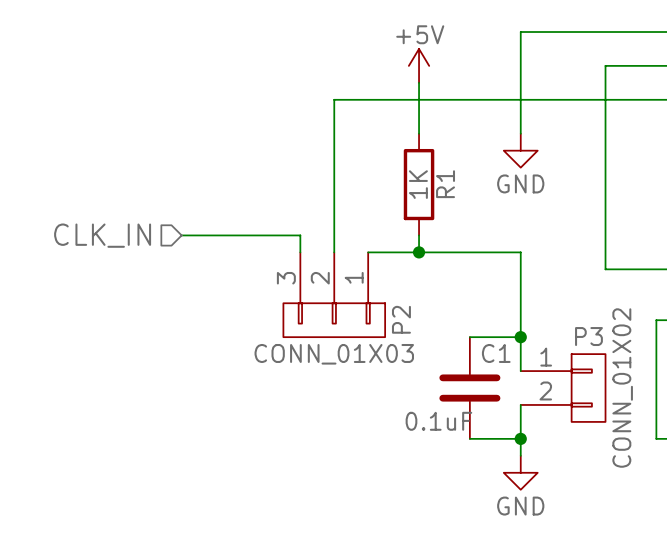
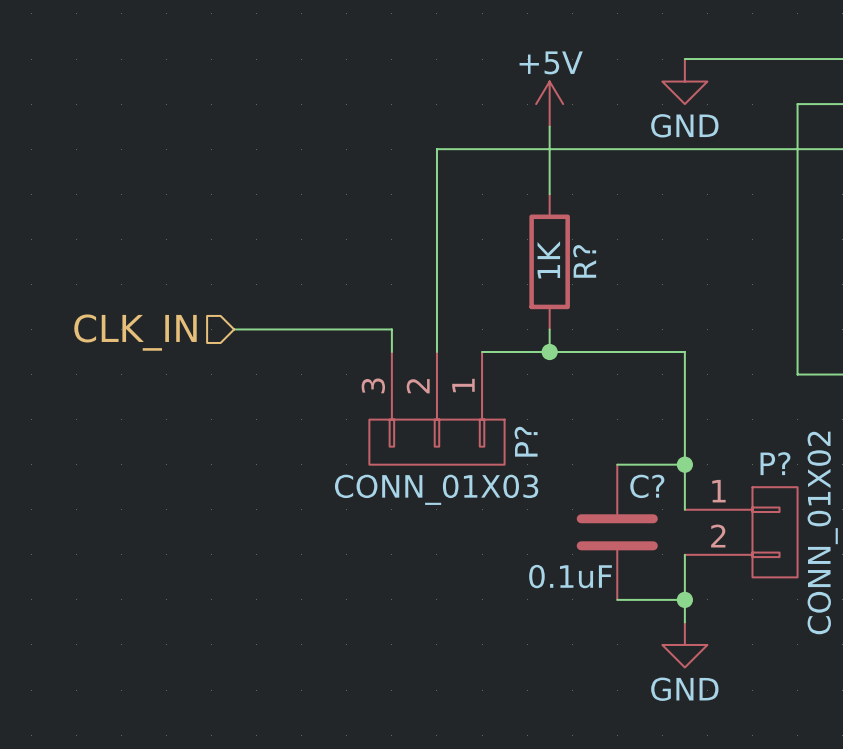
wire: (520, 32) (520, 133) -> none
power symbol position: GND (520, 150) -> GND (684, 81)
R1 name: R1 (445, 184) -> R? (584, 261)
P2 name: P2 (401, 319) -> P? (526, 441)
P3 name: P3 (588, 336) -> P? (775, 463)
C1 name: C1 (496, 353) -> C? (647, 486)

